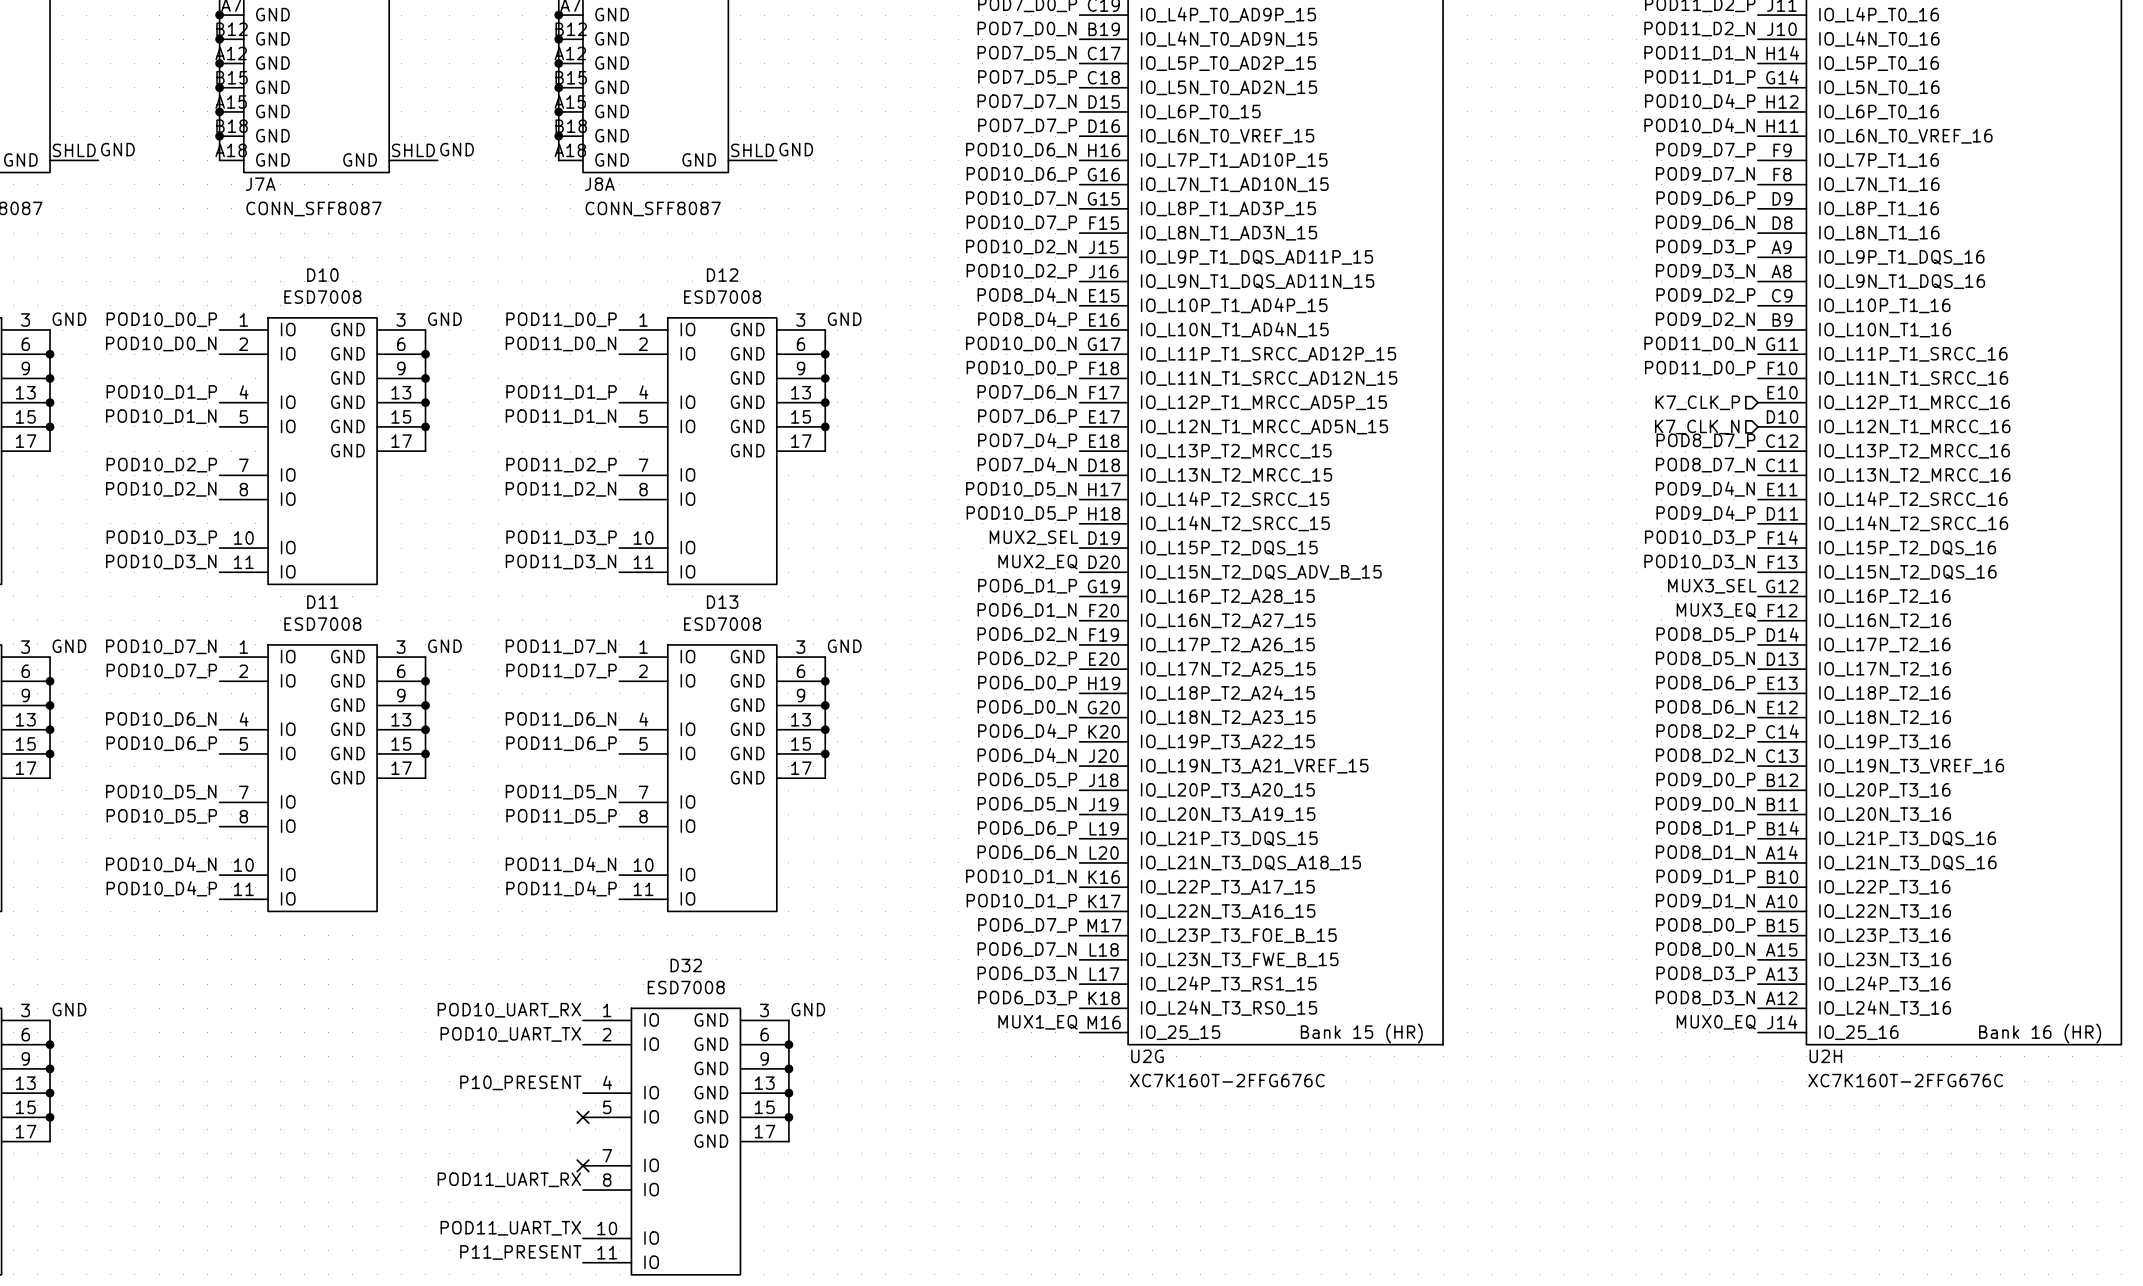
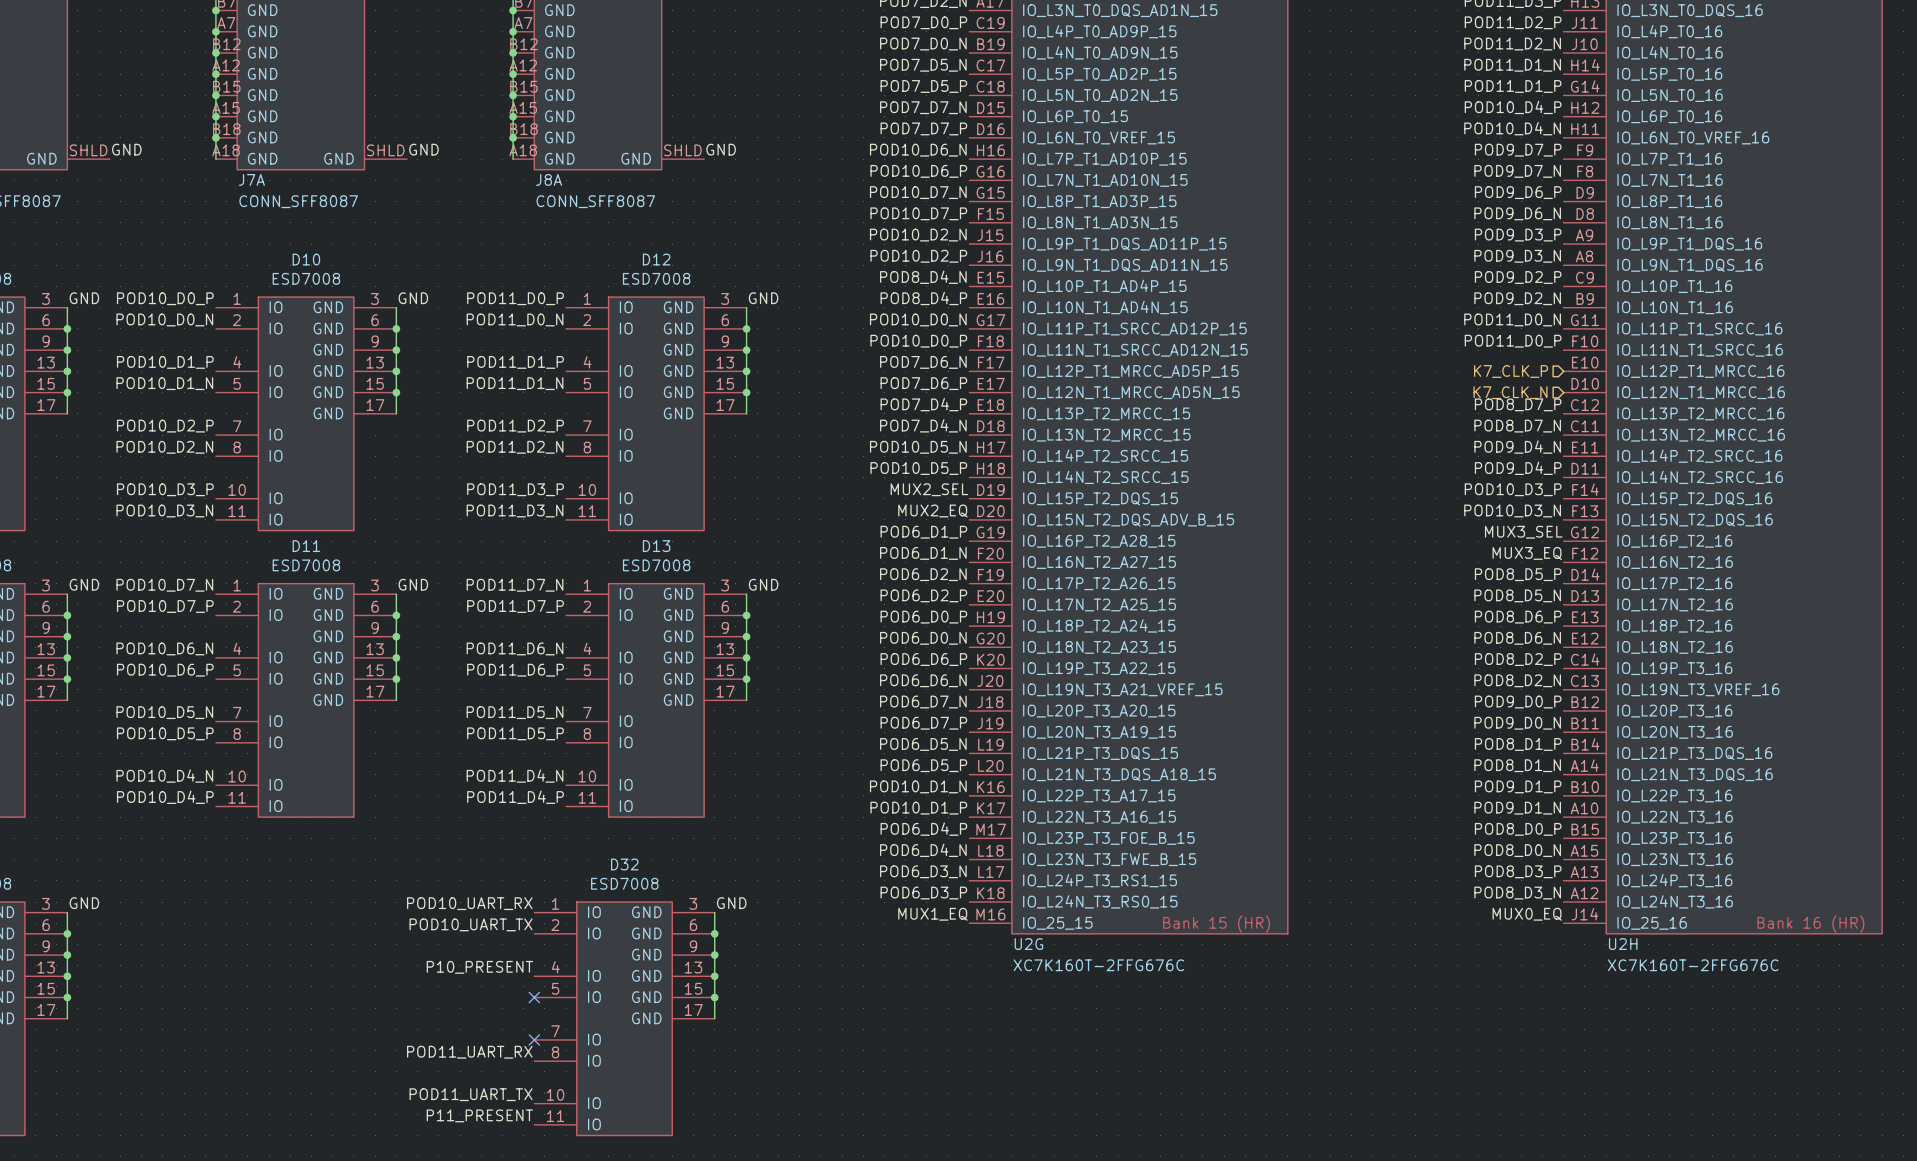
label: POD6_D4_P (1027, 731) -> POD6_D6_P (923, 659)
label: POD6_D4_N (1027, 755) -> POD6_D6_N (923, 680)
label: POD6_D5_P (1027, 780) -> POD6_D7_N (923, 702)
label: POD6_D5_N (1027, 804) -> POD6_D7_P (923, 723)
label: POD6_D6_P (1027, 828) -> POD6_D5_N (923, 744)
label: POD6_D6_N (1027, 852) -> POD6_D5_P (923, 765)
label: POD6_D7_P (1027, 925) -> POD6_D4_P (923, 829)
label: POD6_D7_N (1027, 949) -> POD6_D4_N (923, 850)

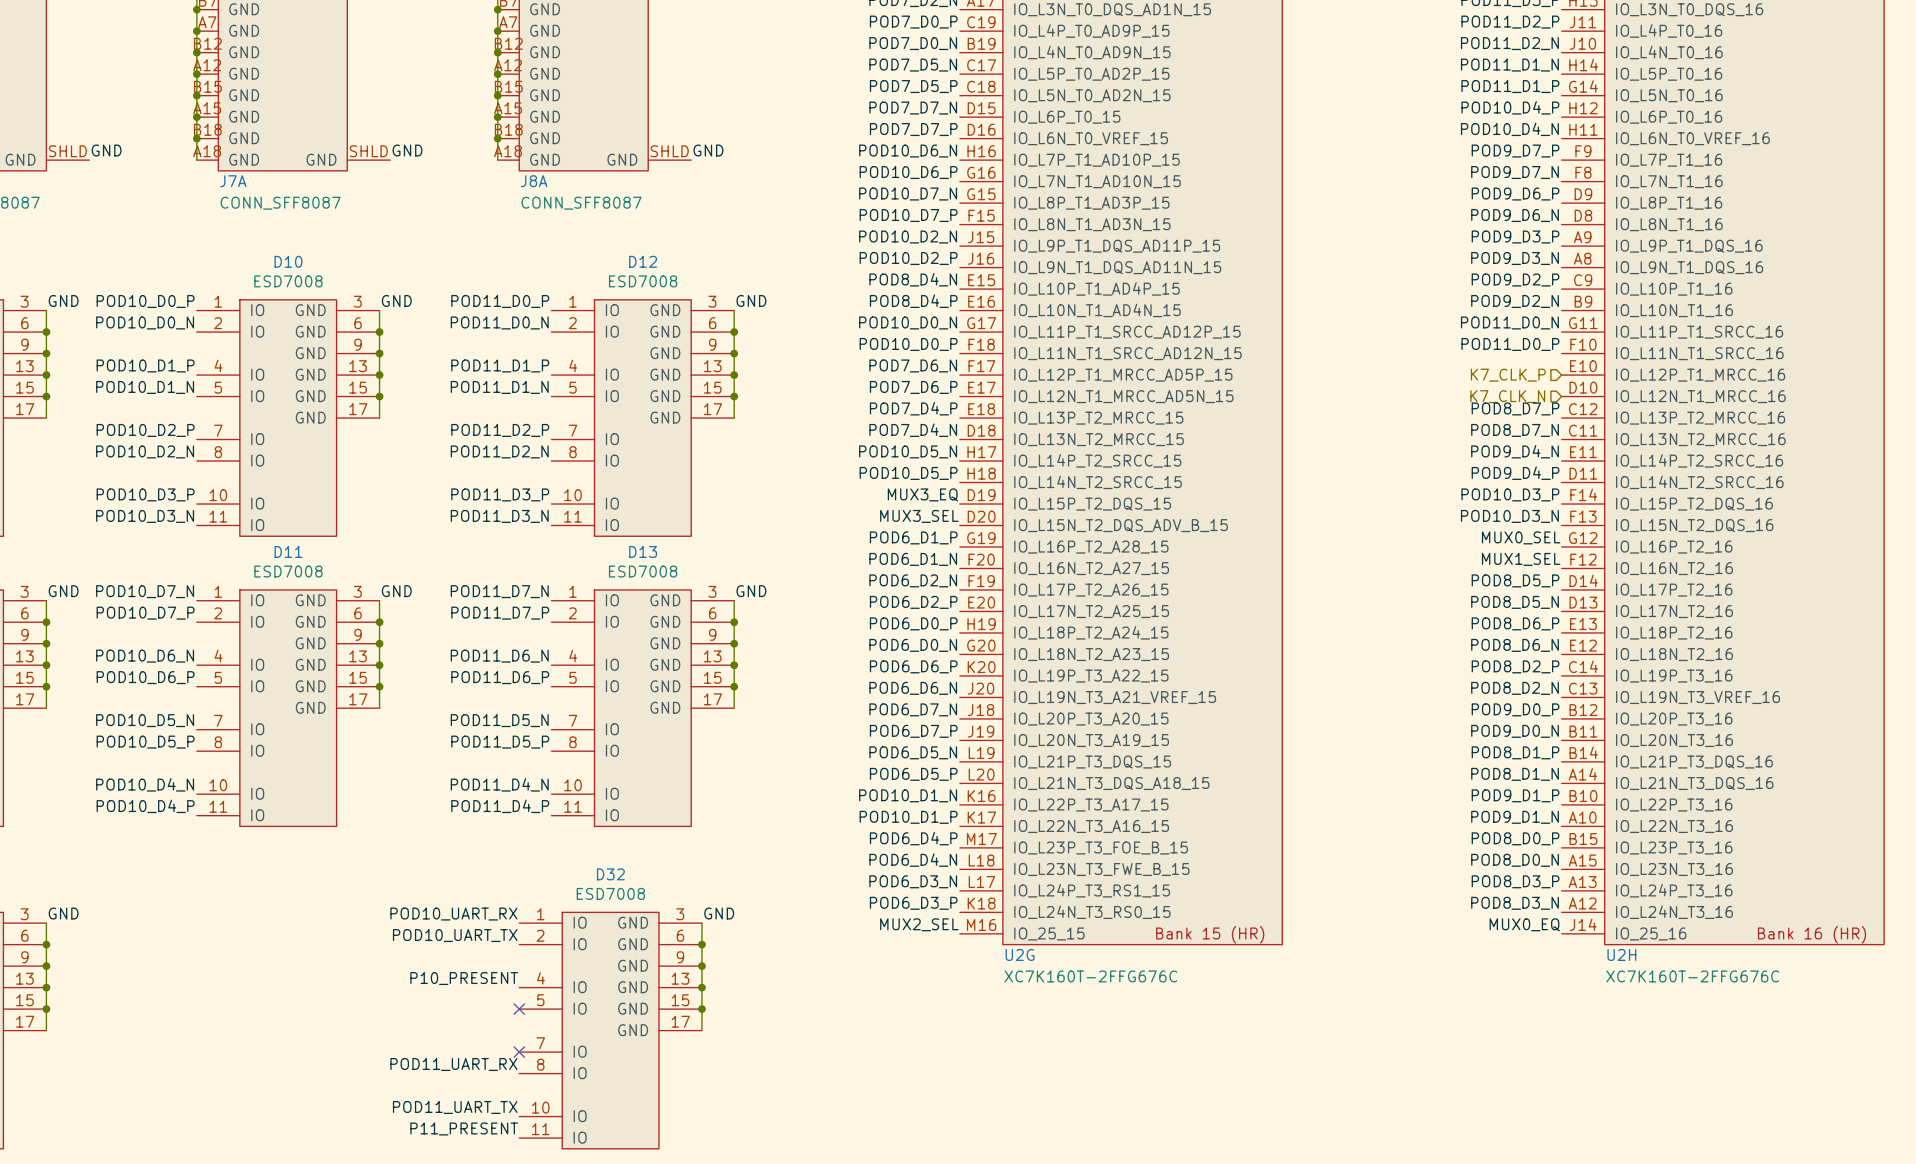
label: MUX2_SEL (929, 489) -> MUX3_EQ (922, 494)
label: MUX2_EQ (932, 510) -> MUX3_SEL (919, 516)
label: MUX3_SEL (1523, 532) -> MUX0_SEL (1521, 537)
label: MUX3_EQ (1527, 553) -> MUX1_SEL (1521, 559)
label: MUX1_EQ (932, 914) -> MUX2_SEL (919, 924)

